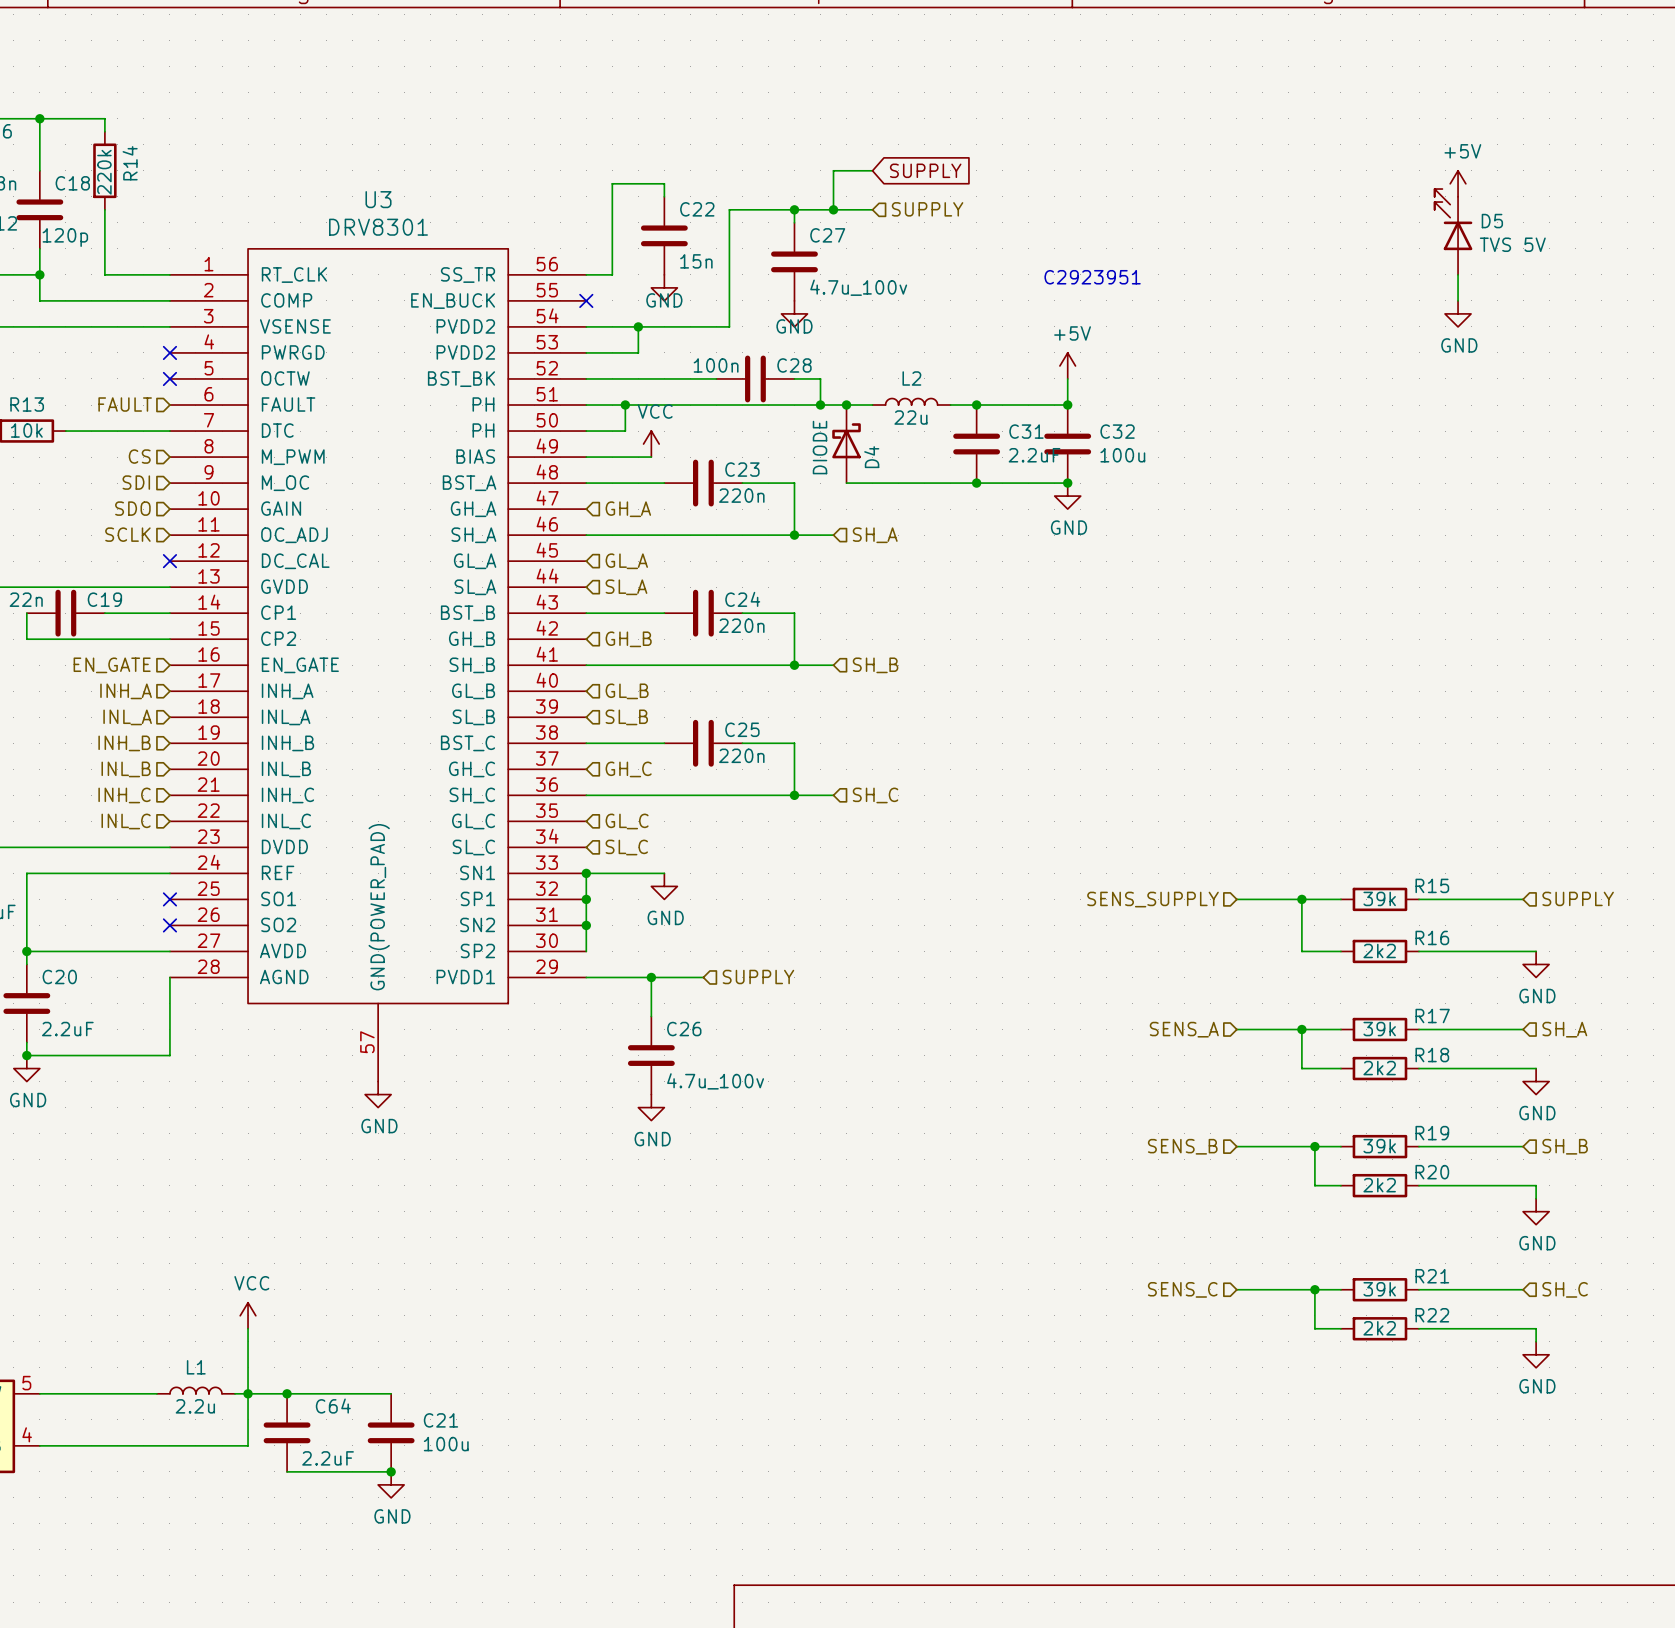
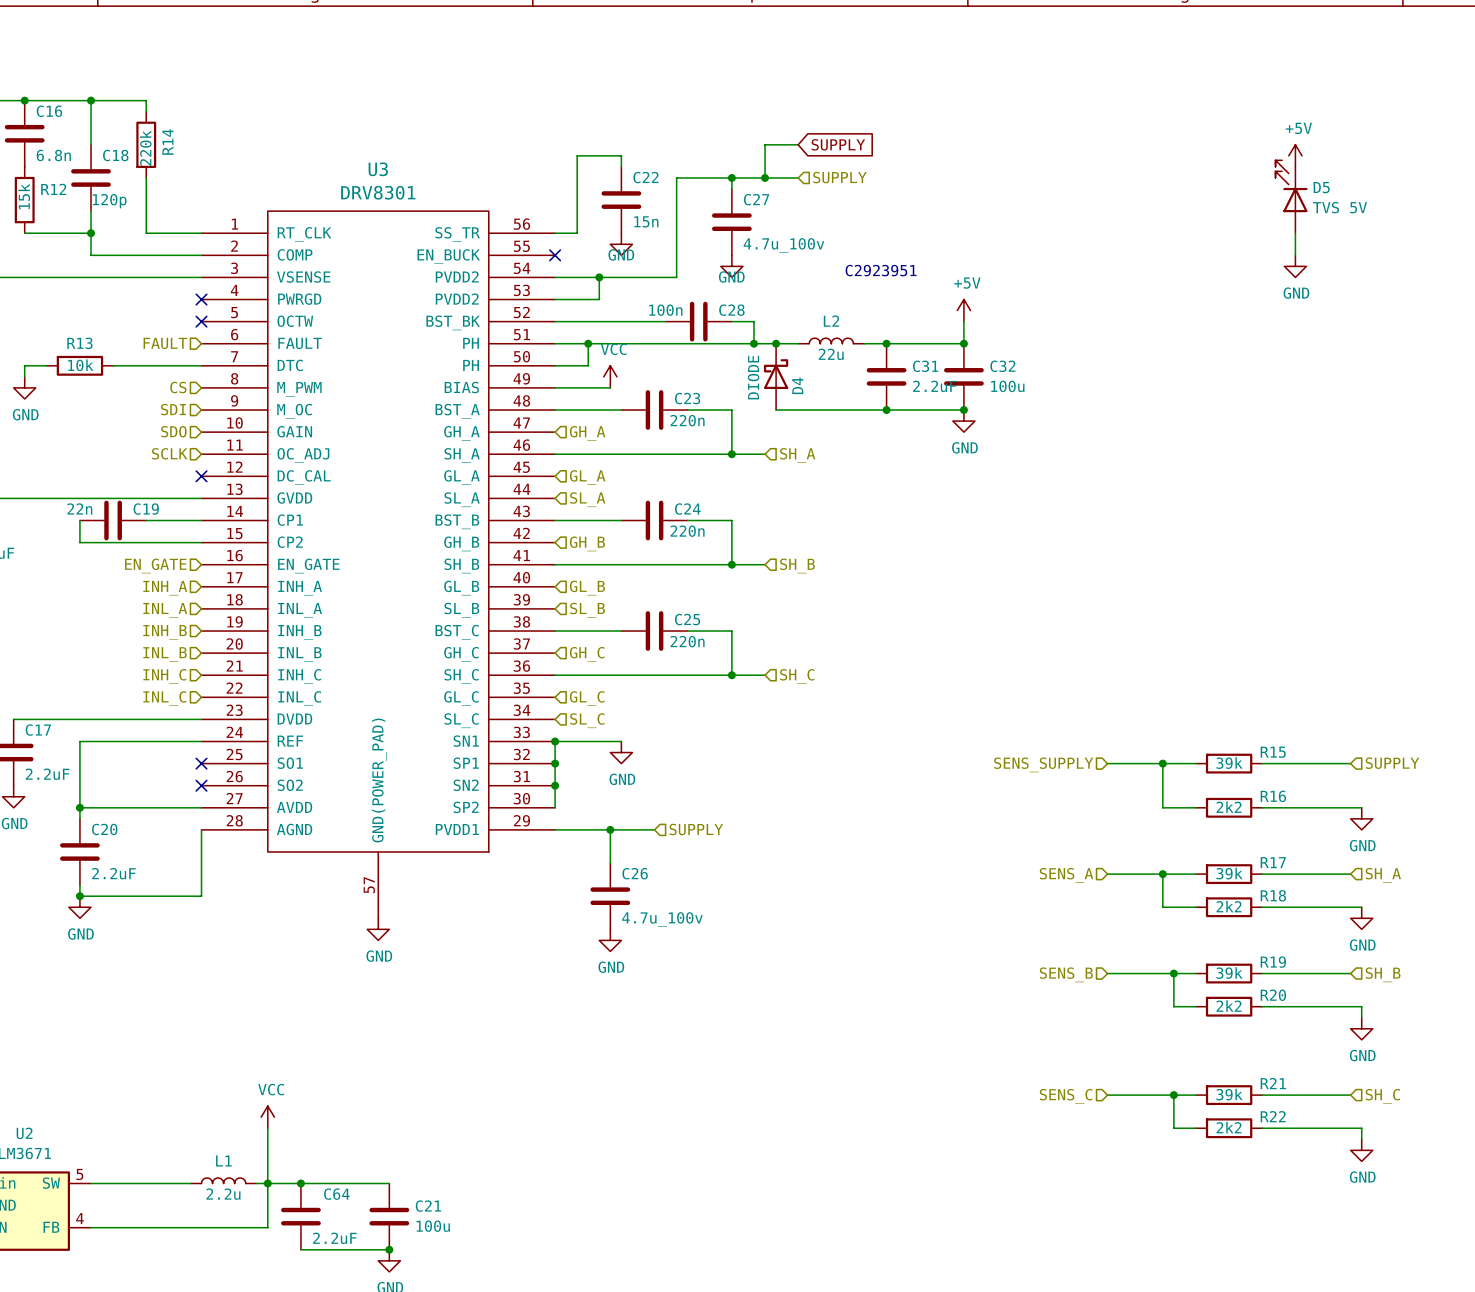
text position: C2923951 (1092, 277) -> C2923951 (881, 270)

